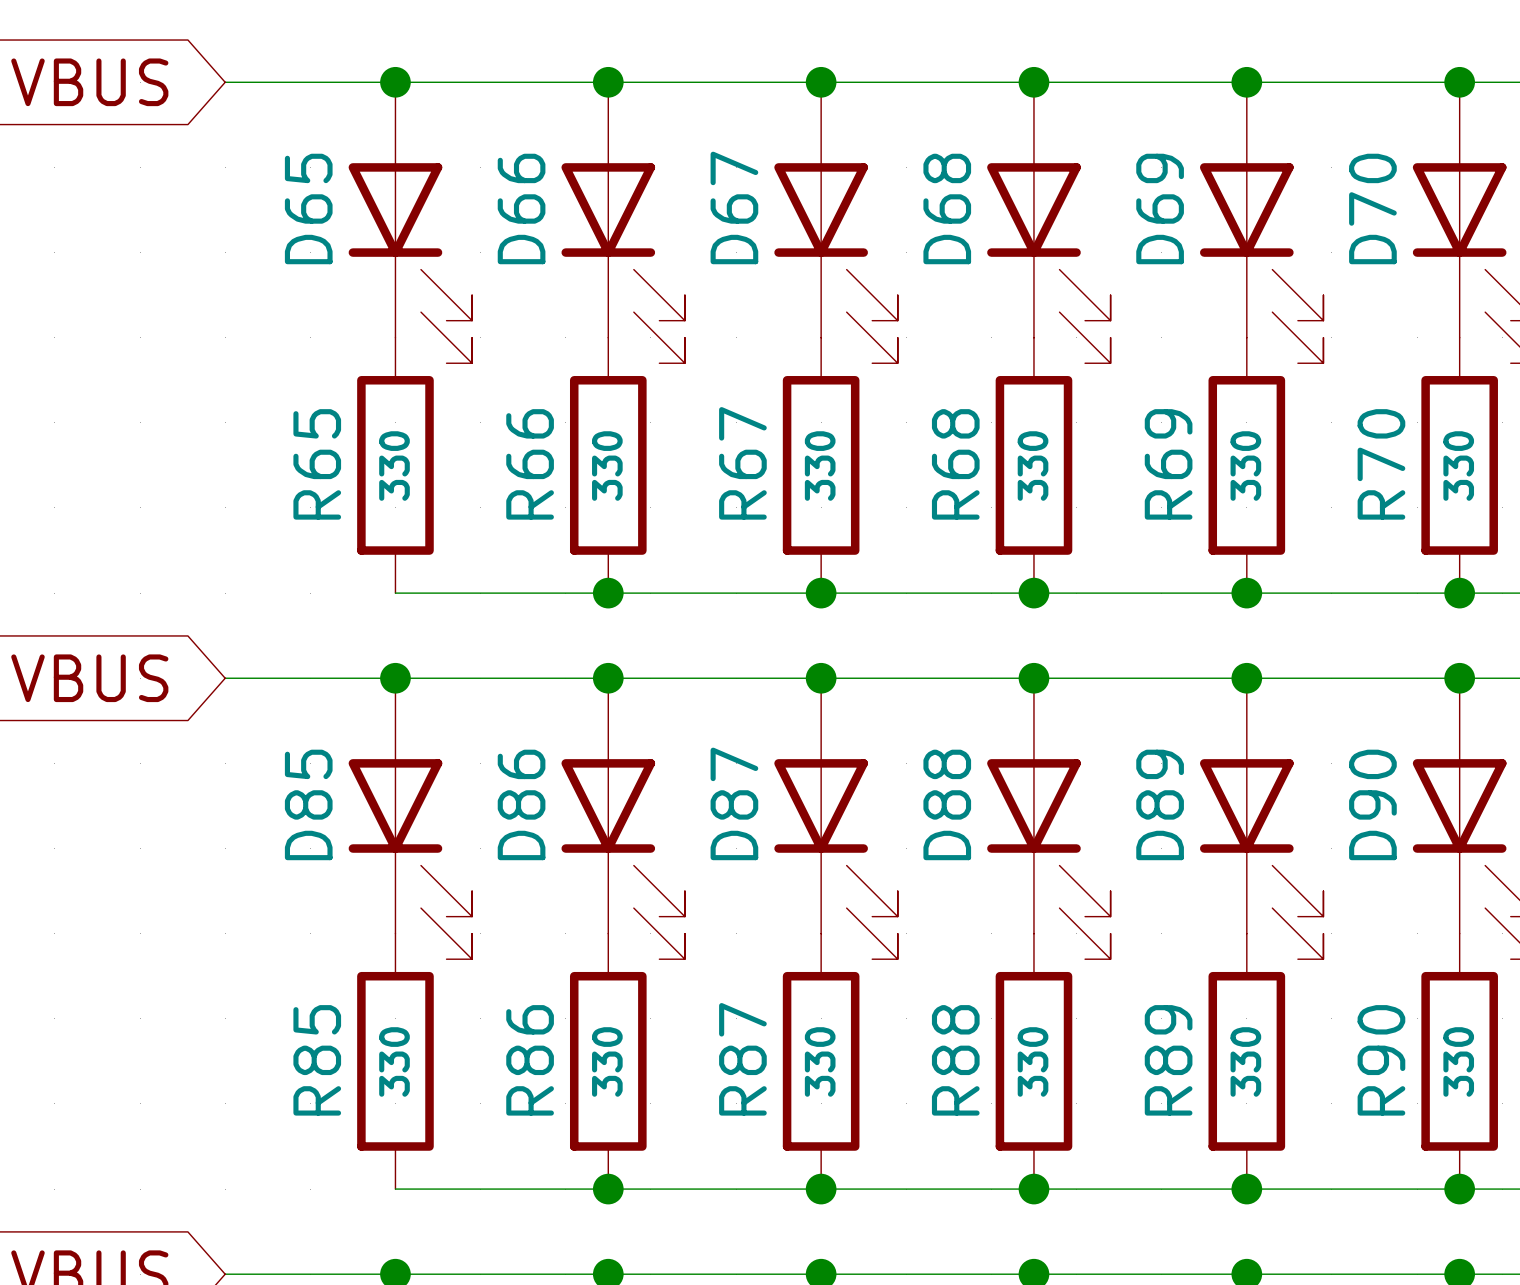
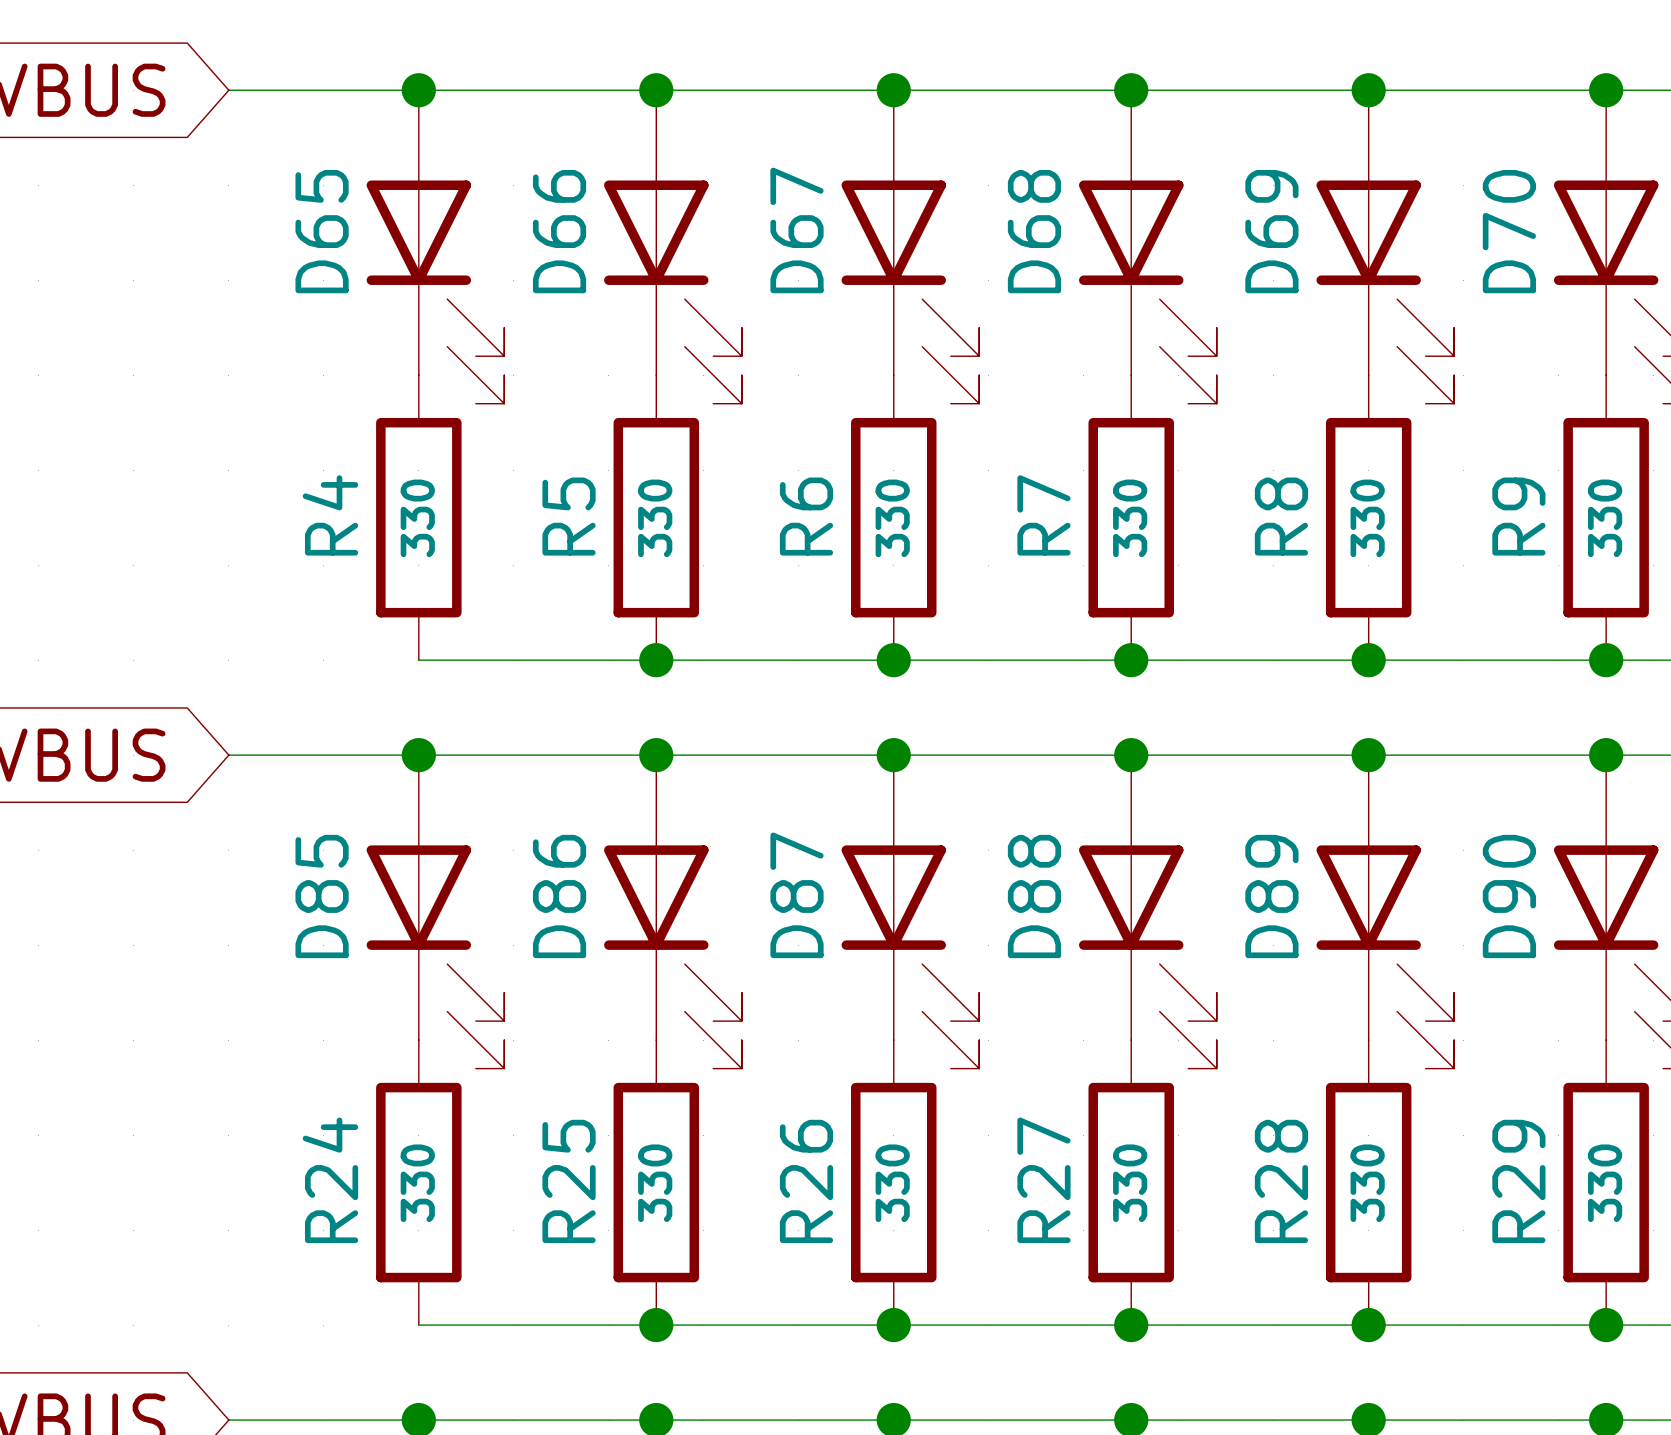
R67 name: R67 (742, 463) -> R6 (806, 516)
R65 name: R65 (317, 464) -> R4 (330, 515)
R66 name: R66 (530, 464) -> R5 (569, 516)
R68 name: R68 (955, 464) -> R7 (1043, 515)
R69 name: R69 (1168, 464) -> R8 (1281, 516)
R70 name: R70 (1381, 464) -> R9 (1518, 516)
R87 name: R87 (742, 1059) -> R26 (806, 1181)
R85 name: R85 (317, 1060) -> R24 (330, 1180)
R86 name: R86 (530, 1060) -> R25 (569, 1181)
R88 name: R88 (955, 1060) -> R27 (1043, 1180)
R89 name: R89 (1168, 1060) -> R28 (1281, 1181)
R90 name: R90 (1381, 1060) -> R29 (1518, 1181)

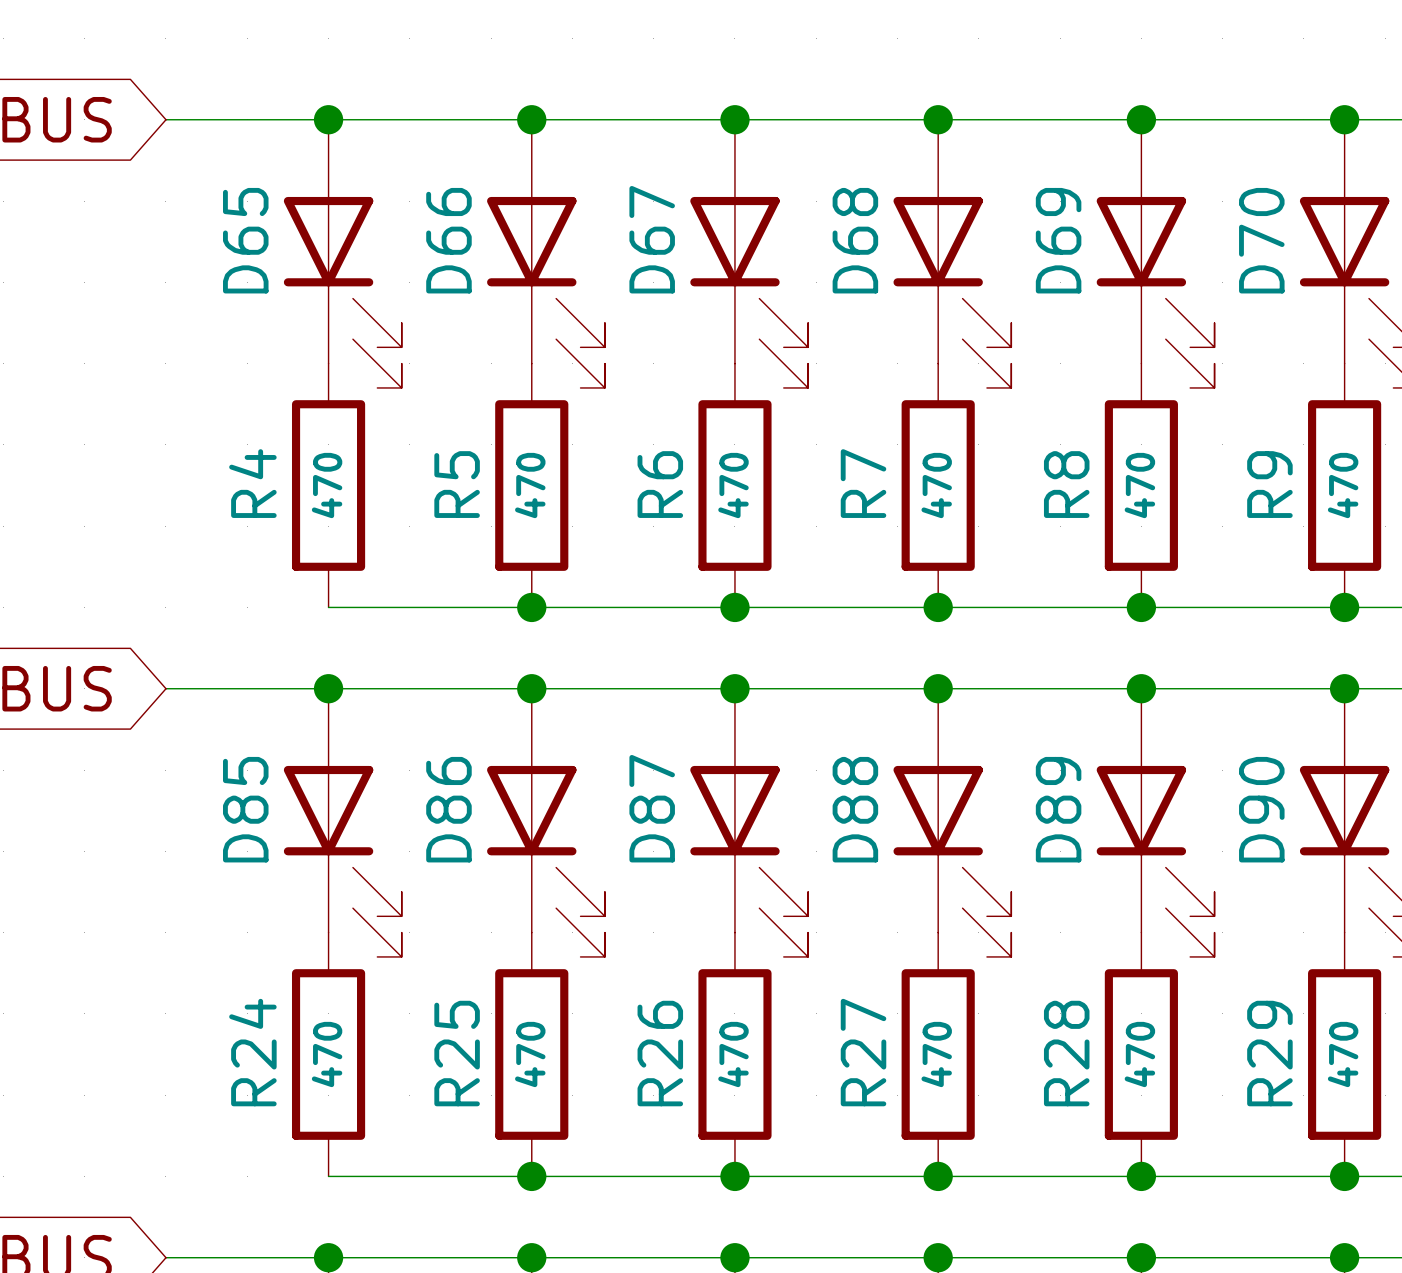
R4 value: 330 (417, 518) -> 470 (327, 485)
R5 value: 330 (655, 518) -> 470 (530, 485)
R6 value: 330 (892, 518) -> 470 (733, 485)
R7 value: 330 (1130, 518) -> 470 (936, 485)
R8 value: 330 (1367, 518) -> 470 (1139, 485)
R9 value: 330 (1605, 518) -> 470 (1343, 485)
R24 value: 330 (417, 1183) -> 470 (327, 1054)
R25 value: 330 (655, 1183) -> 470 (530, 1054)
R26 value: 330 (892, 1183) -> 470 (733, 1054)
R27 value: 330 (1130, 1183) -> 470 (936, 1054)
R28 value: 330 (1367, 1183) -> 470 (1139, 1054)
R29 value: 330 (1605, 1183) -> 470 (1343, 1054)

